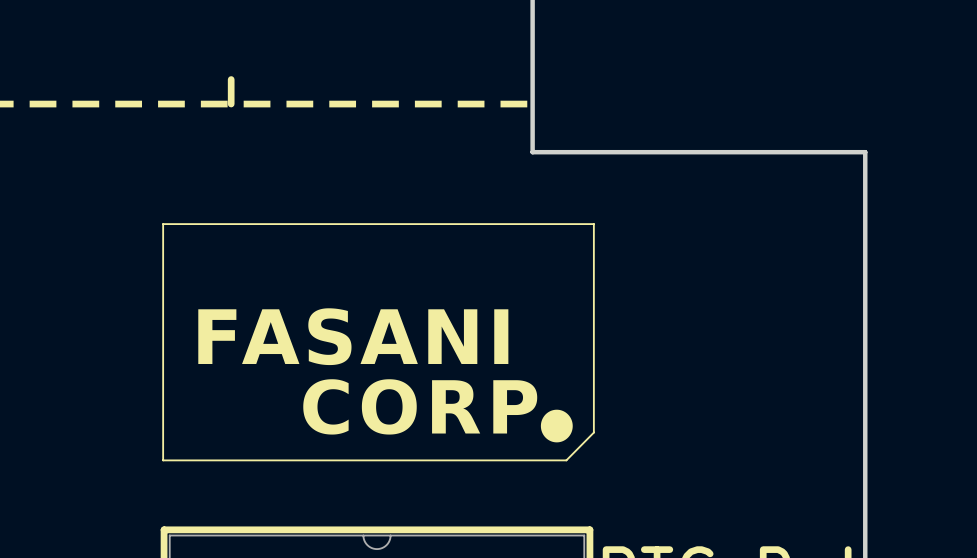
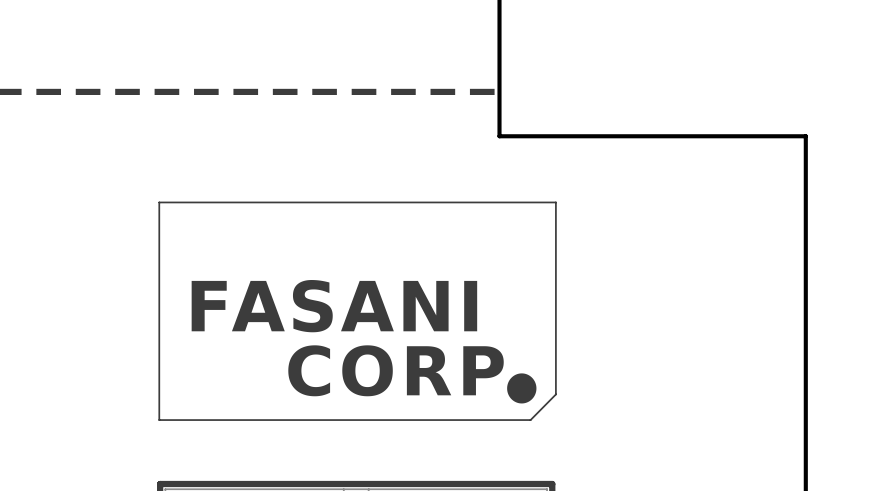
line: (231, 79) (231, 104) -> none

